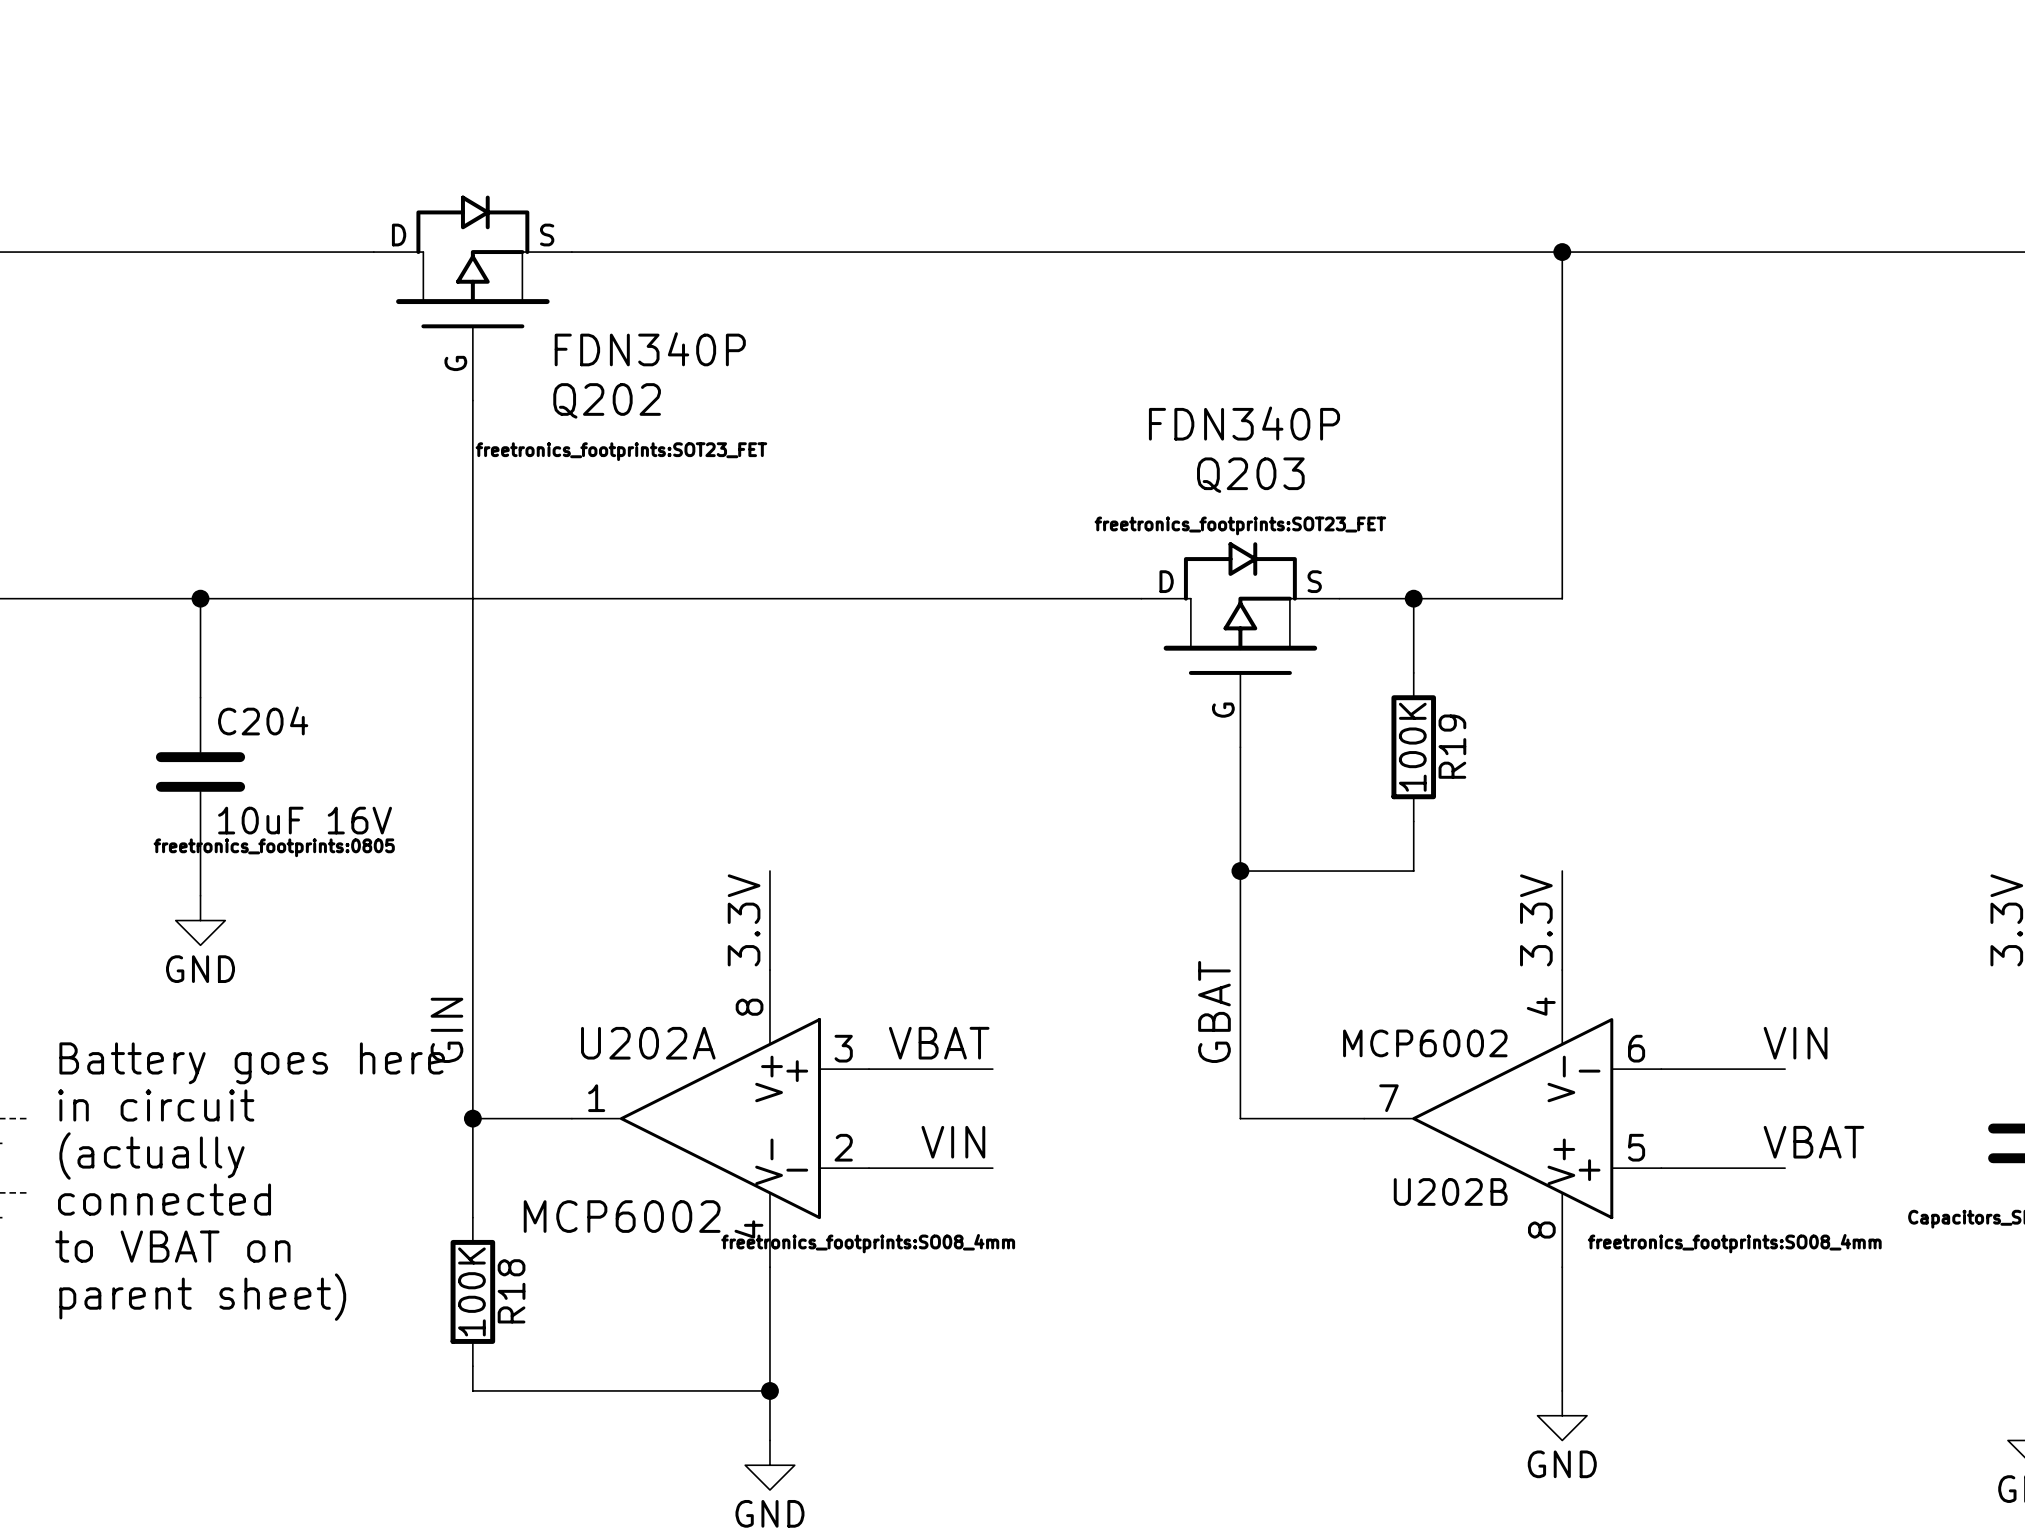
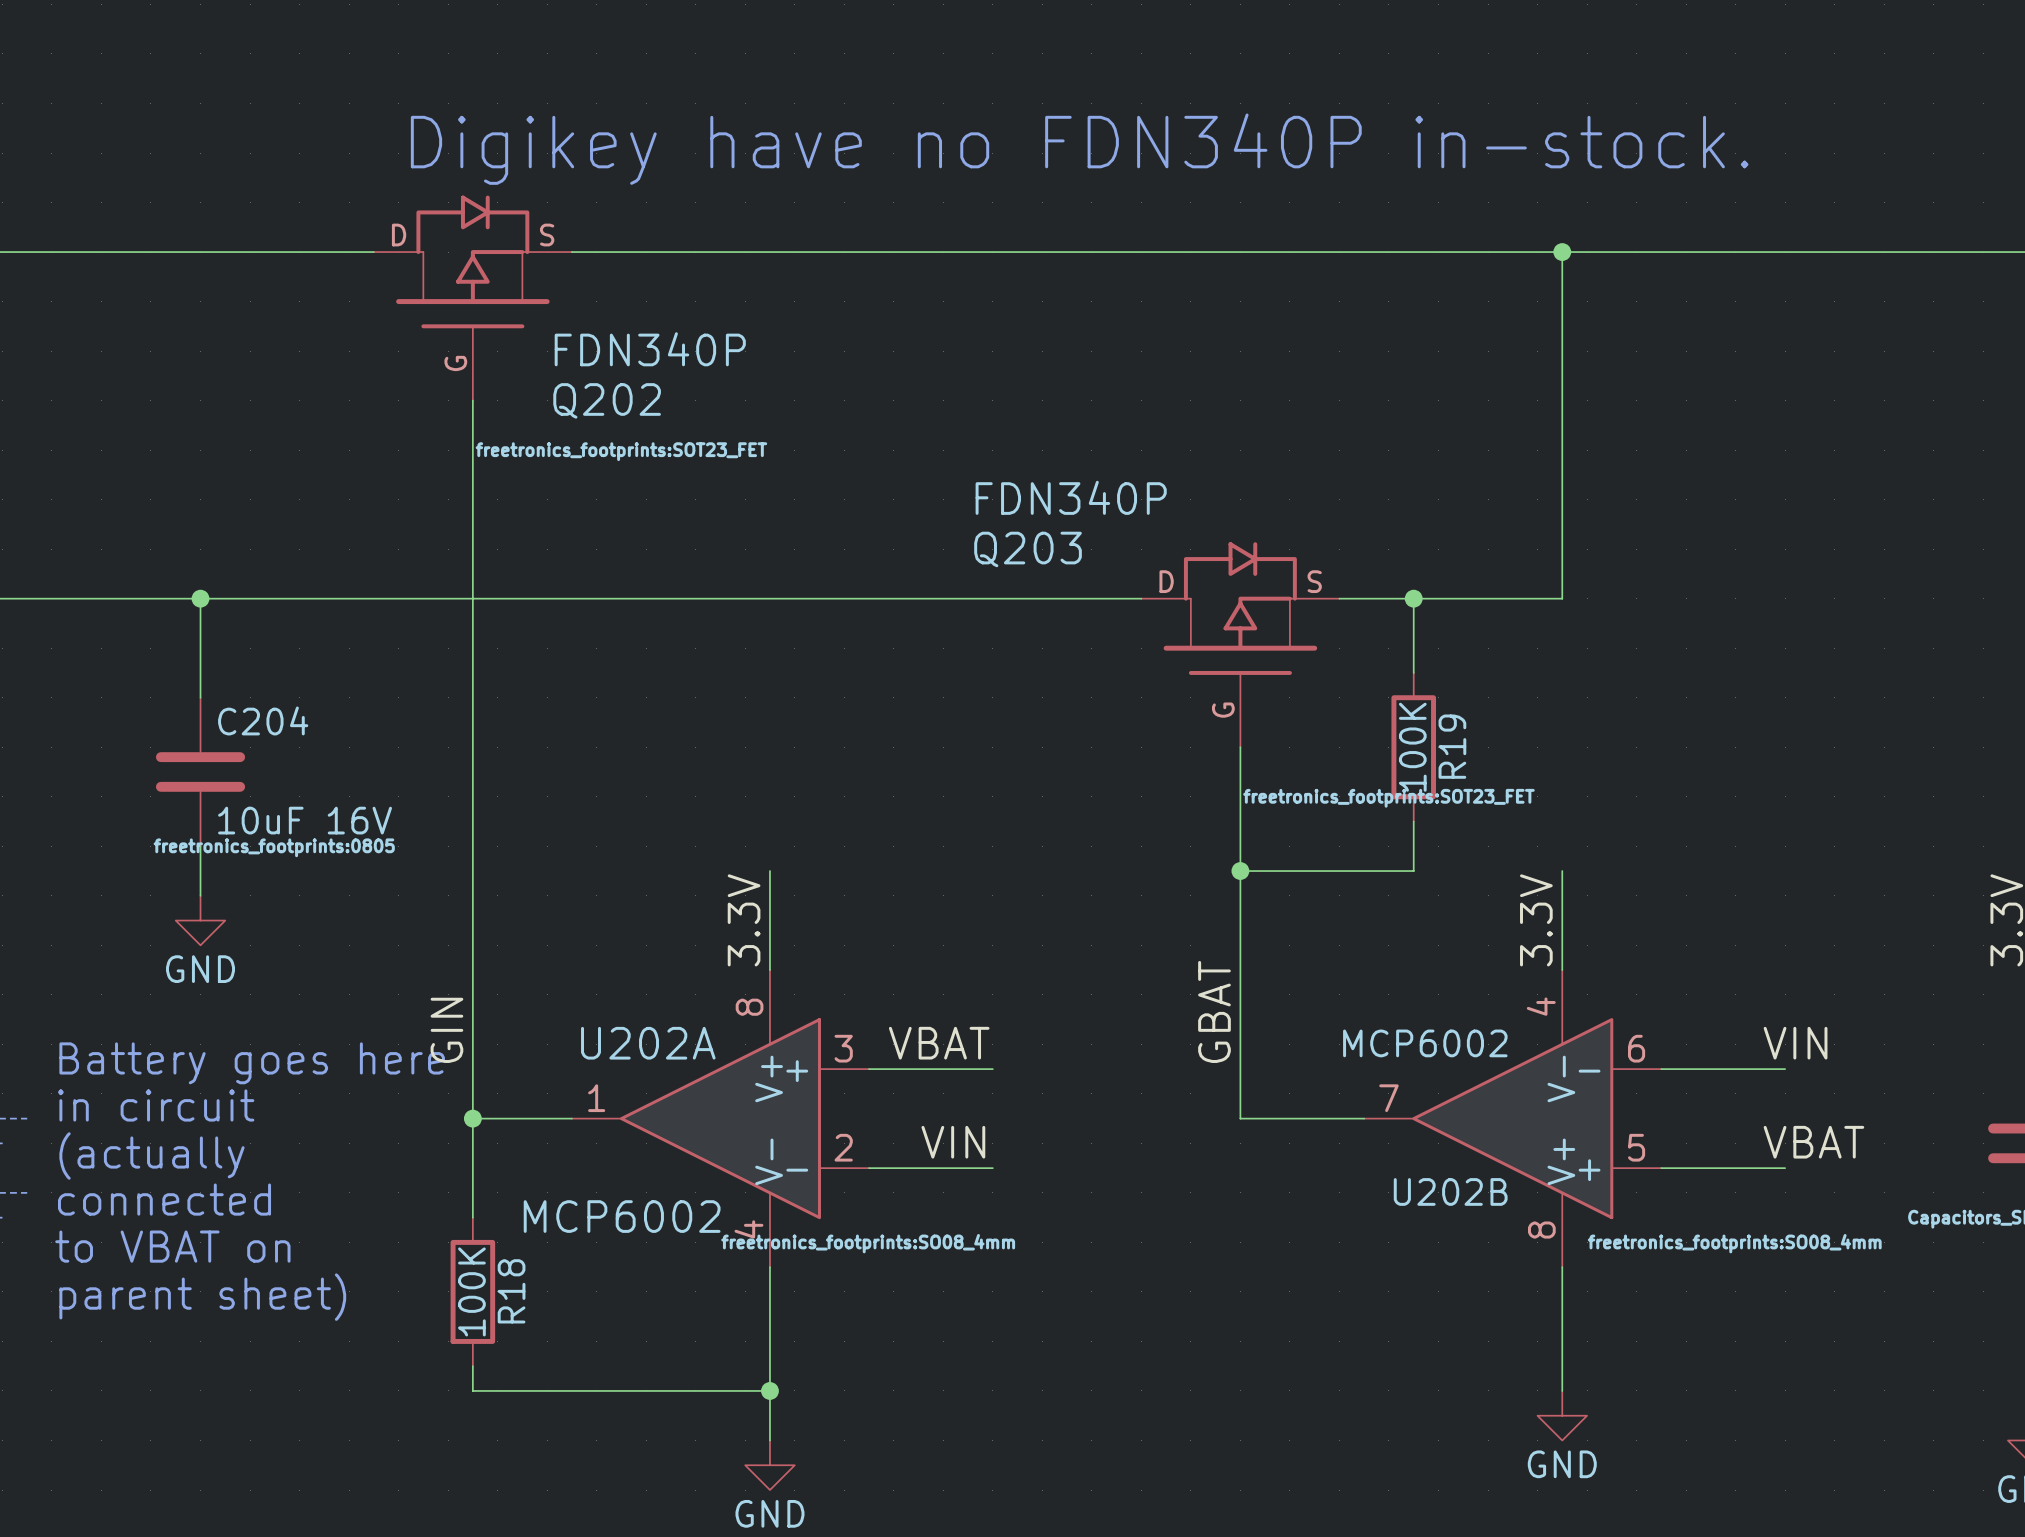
text: none -> Digikey have no FDN340P in-stock. (1079, 149)
Q203 value position: FDN340P (1244, 423) -> FDN340P (1071, 497)
Q203 name position: Q203 (1250, 475) -> Q203 (1028, 549)
Q203 text position: freetronics_footprints:SOT23_FET (1240, 525) -> freetronics_footprints:SOT23_FET (1388, 798)

